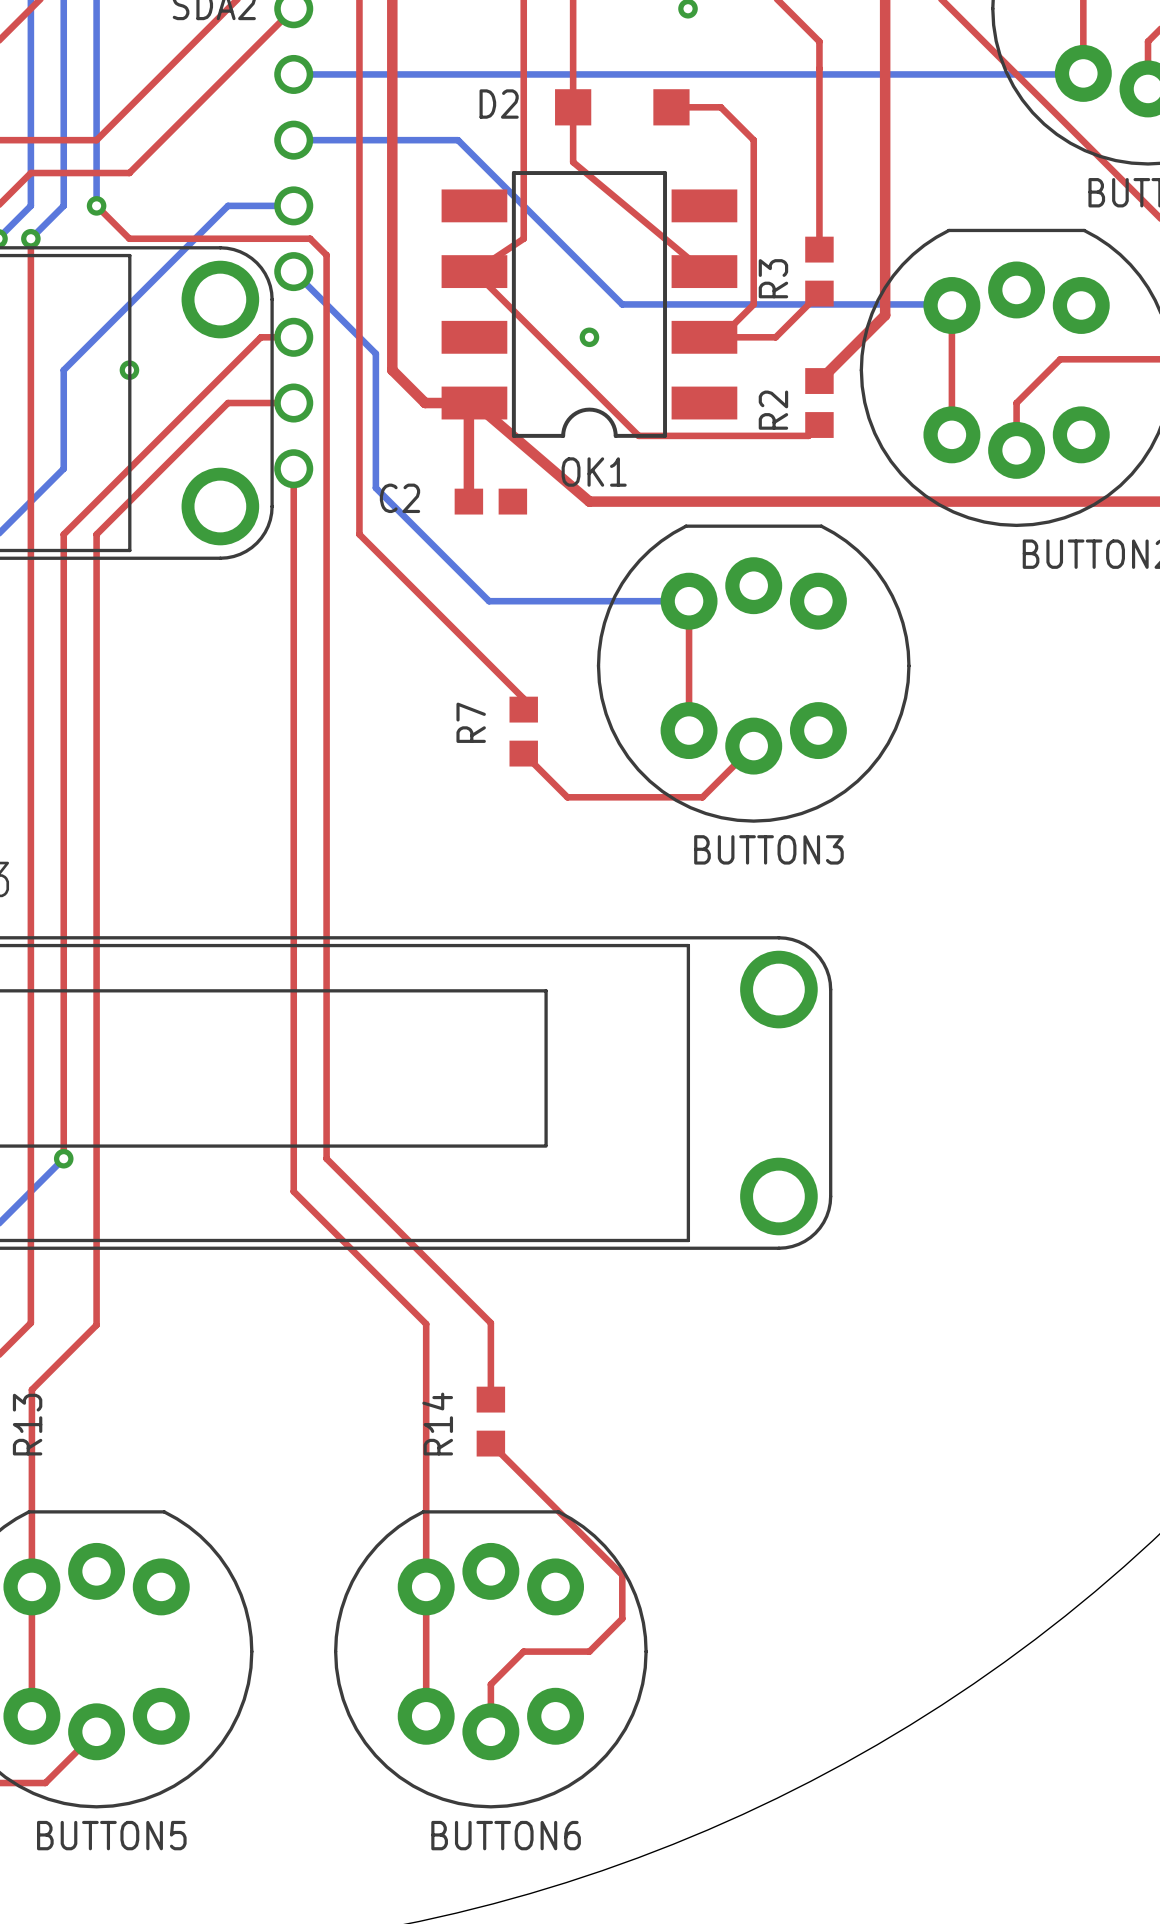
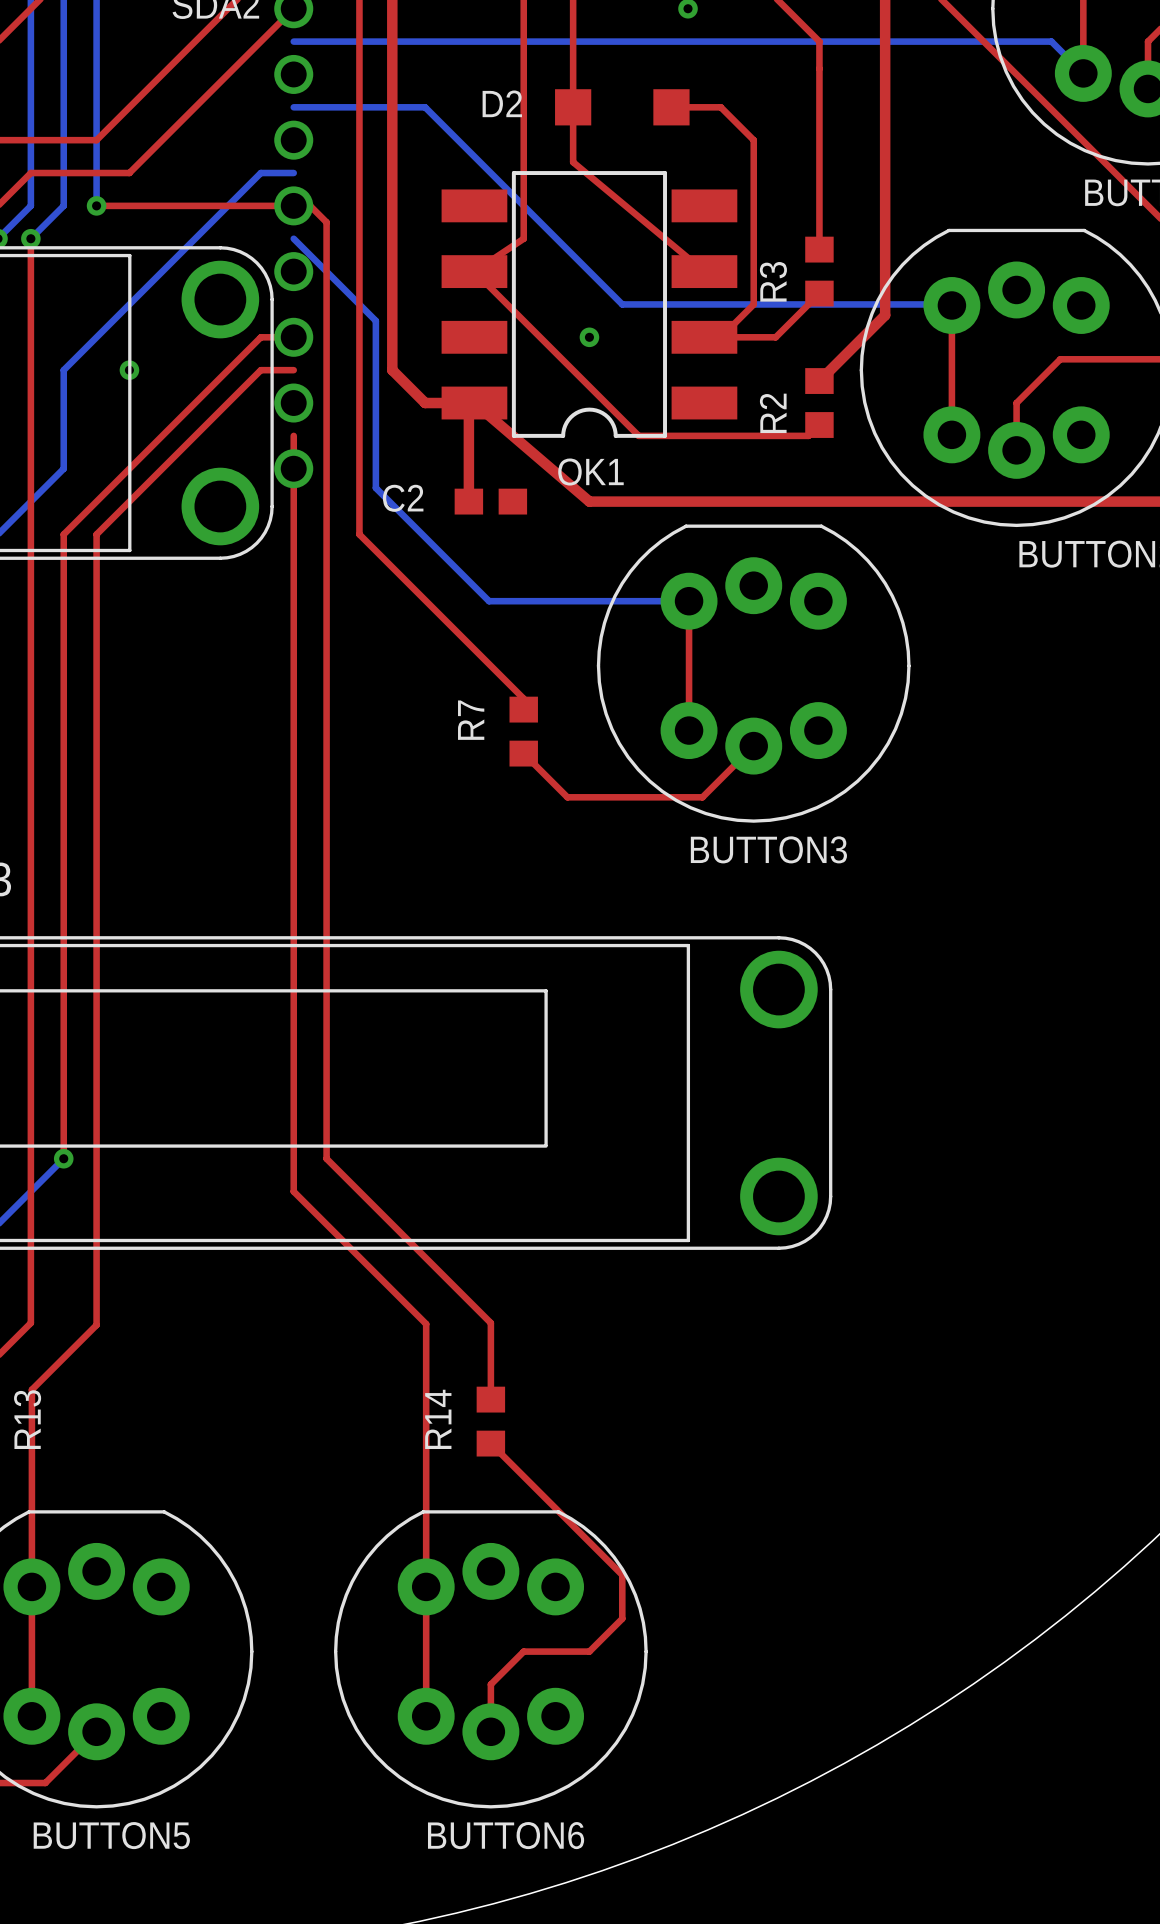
bottom track: (1083, 73) (293, 74) -> (1083, 73) (1051, 41) (293, 41)
bottom track: (293, 140) (458, 140) -> (293, 107) (425, 107) (458, 140)
top track: (96, 205) (129, 238) (310, 238) (326, 255) -> (96, 205) (310, 205) (326, 222) (326, 255)
bottom track: (228, 205) (293, 205) -> (228, 205) (260, 173) (293, 173)
bottom track: (293, 271) (375, 353) -> (293, 238) (375, 320) (375, 353)
top track: (228, 403) (293, 403) -> (228, 403) (260, 370) (293, 370)
top track: none -> (293, 435) (293, 468)

